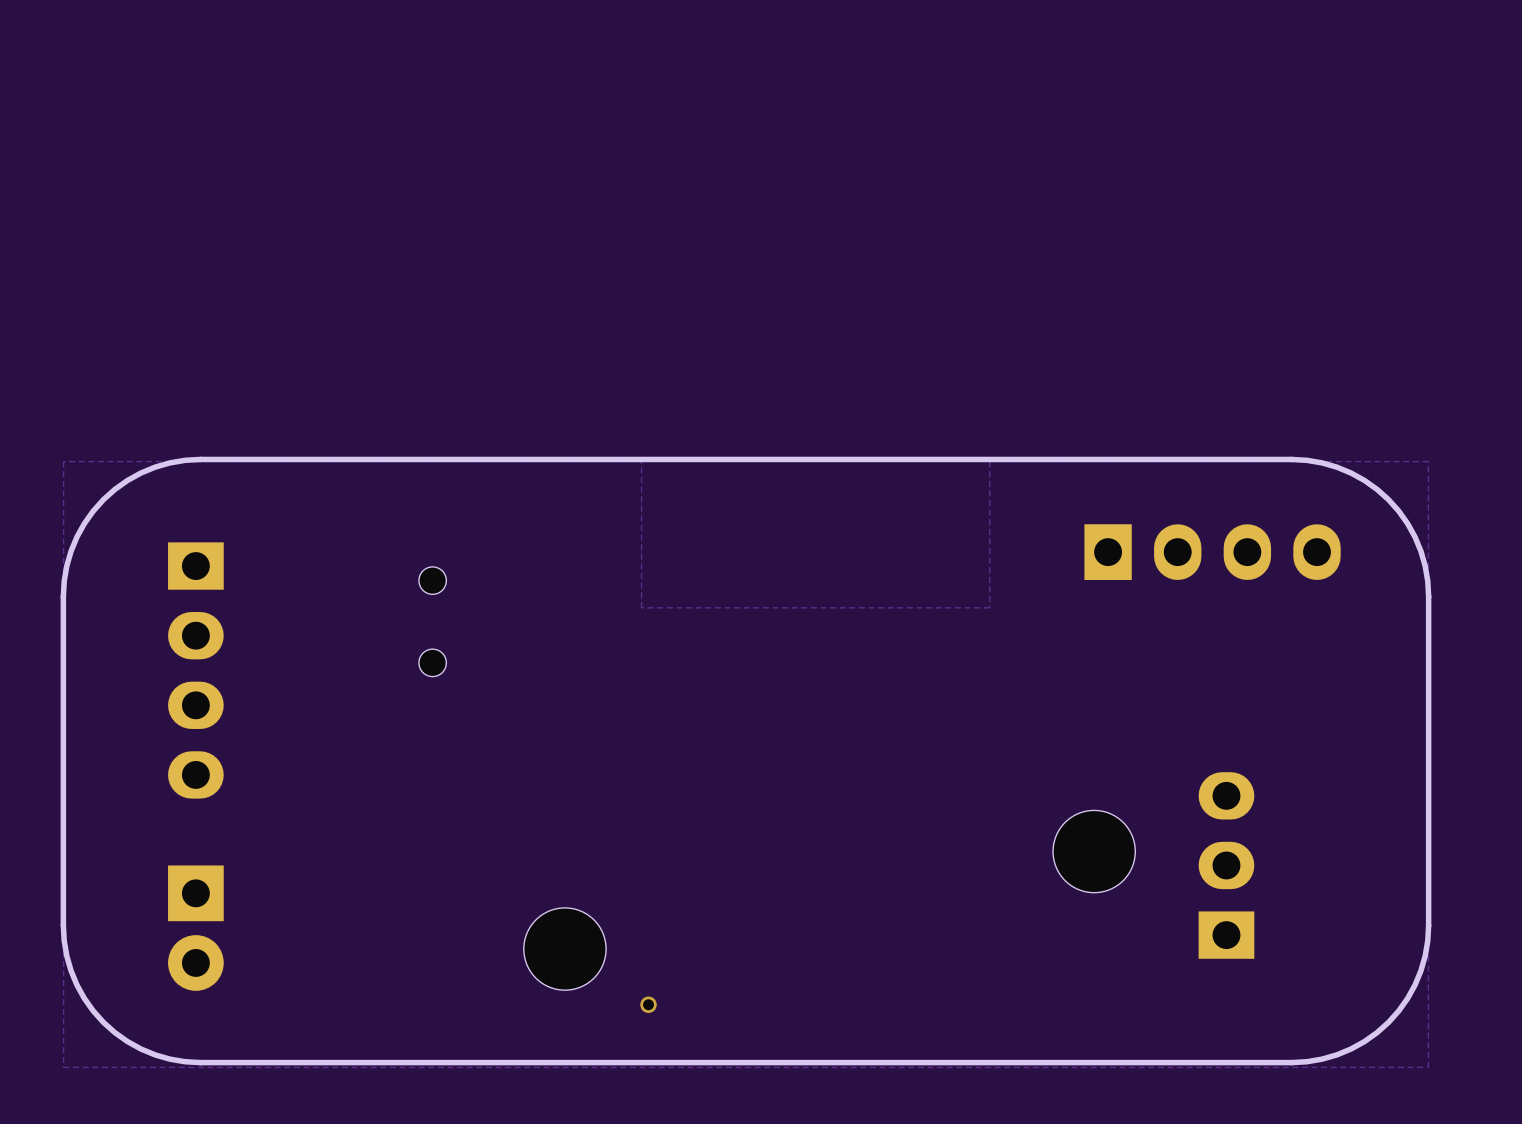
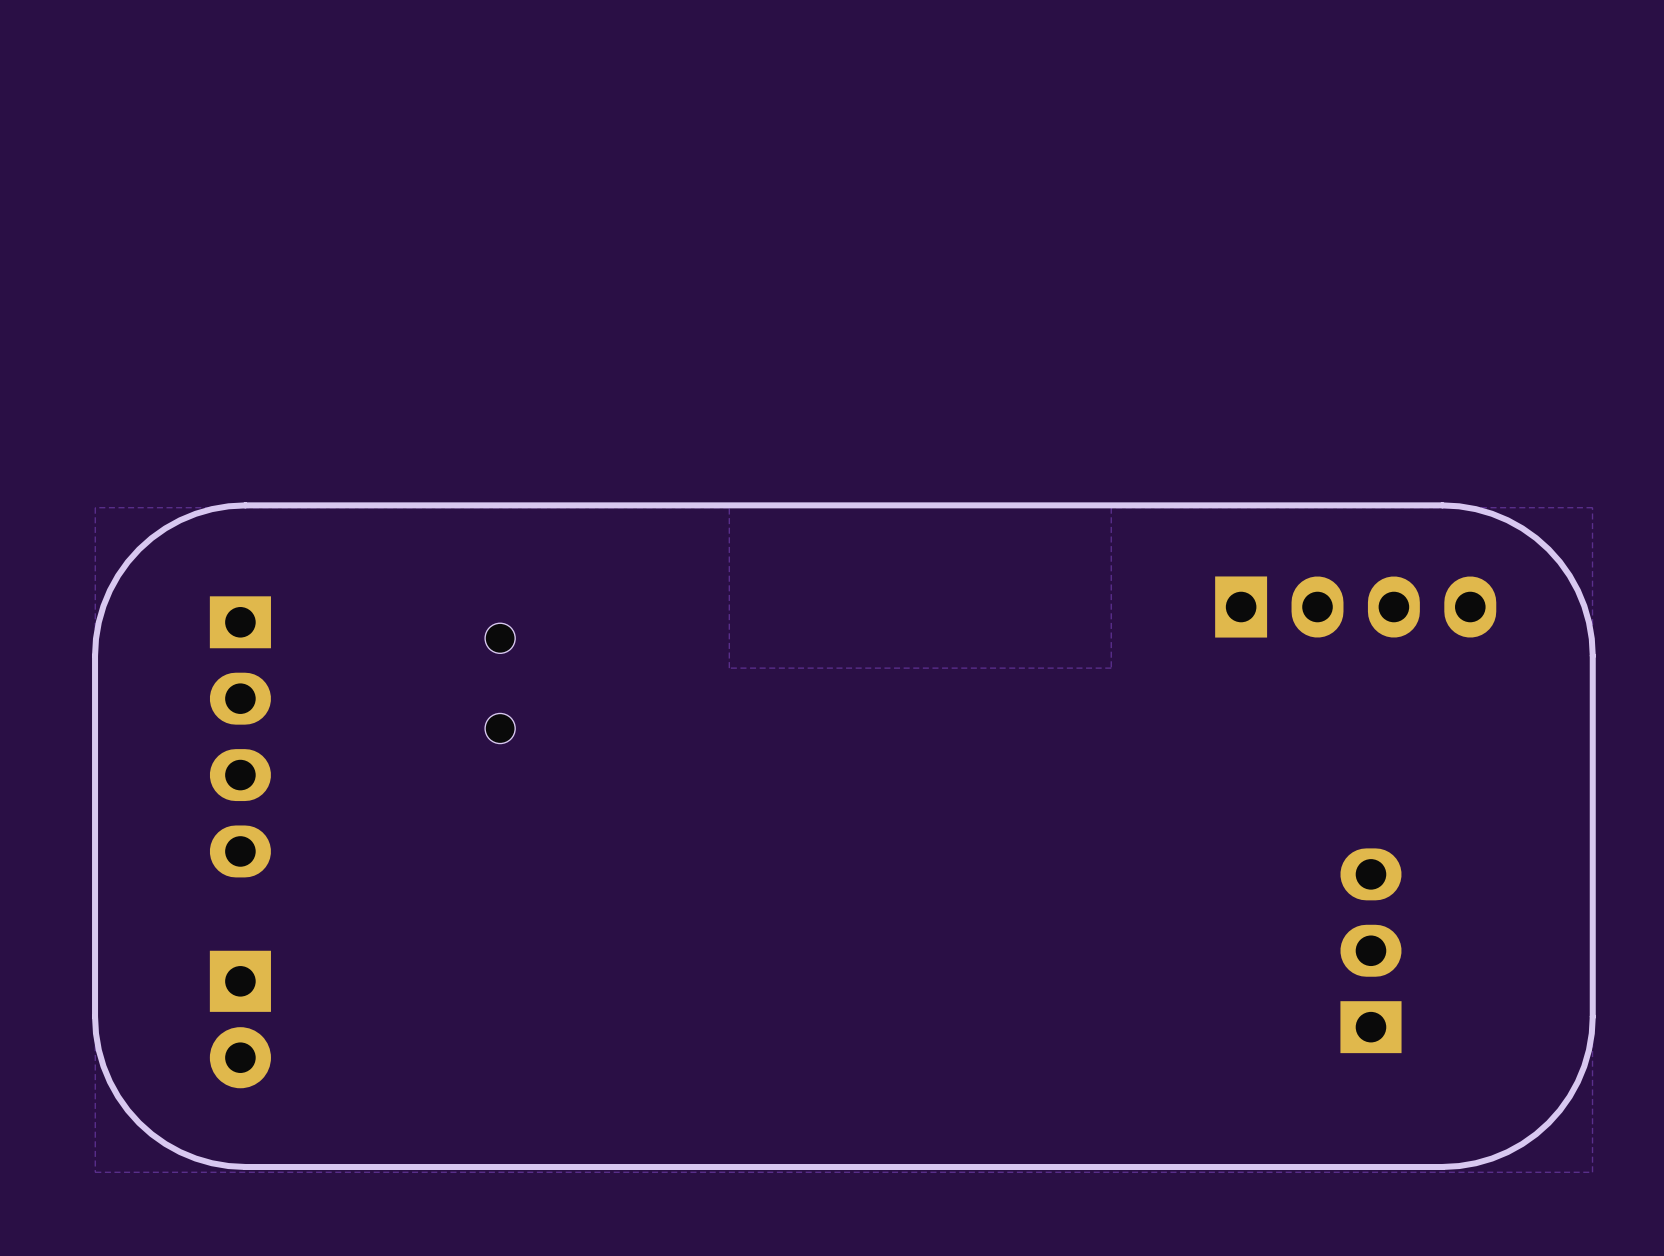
part: (1094, 851) -> none
part: (564, 949) -> none
via: (648, 1004) -> none

